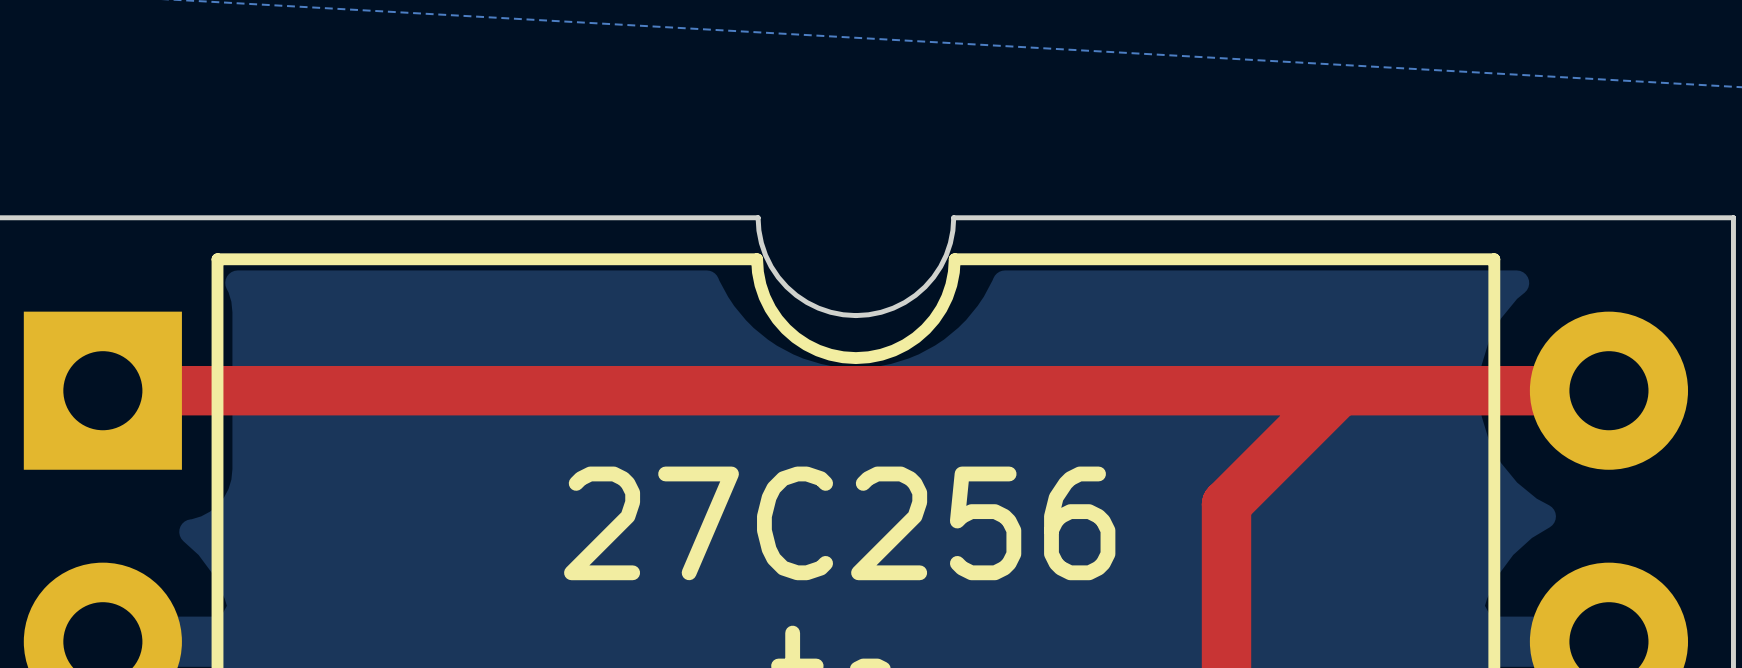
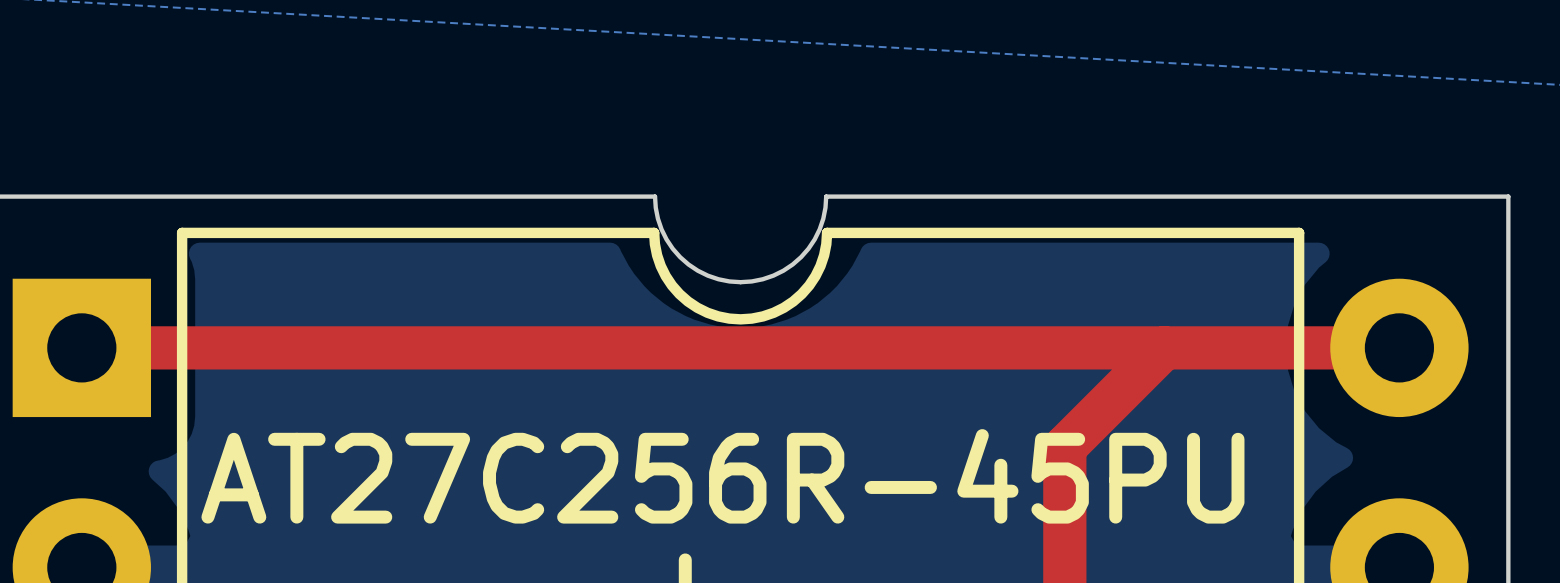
text: 27C256 (839, 523) -> AT27C256R-45PU (722, 476)

